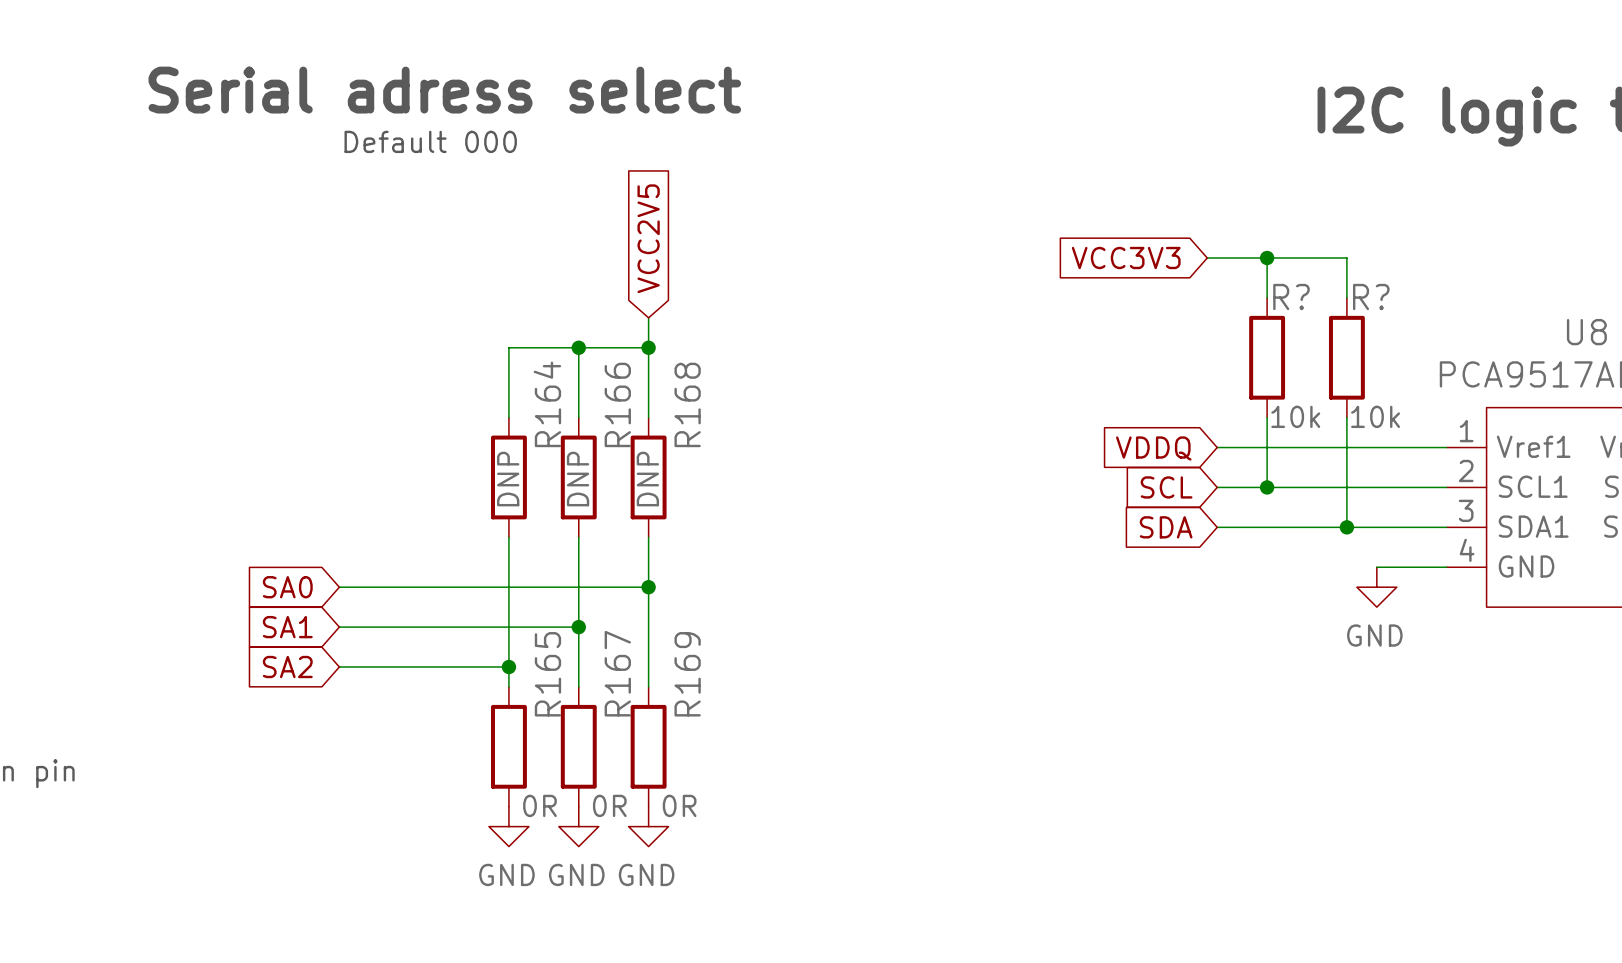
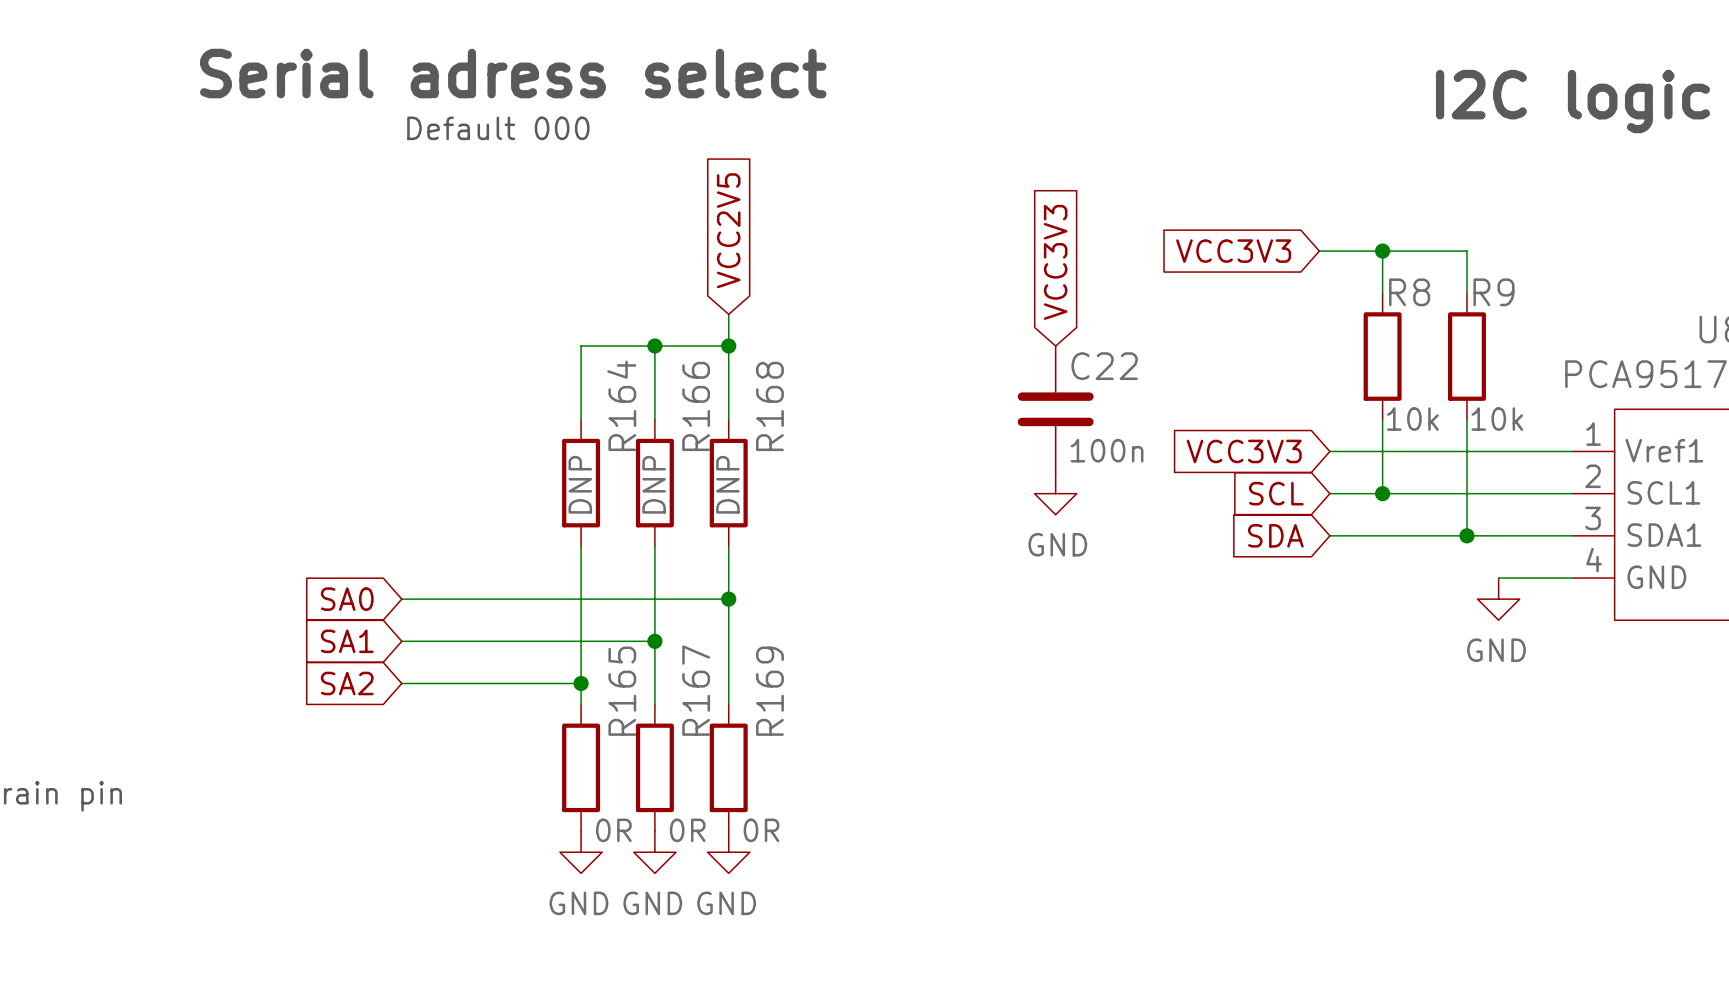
global label: none -> VCC3V3 (1055, 262)
R? name: R? (1291, 297) -> R8 (1409, 292)
R? name: R? (1371, 297) -> R9 (1493, 292)
C22: none -> (1055, 409)
global label: VDDQ (1153, 448) -> VCC3V3 (1244, 451)
power symbol: none -> GND (1055, 493)

